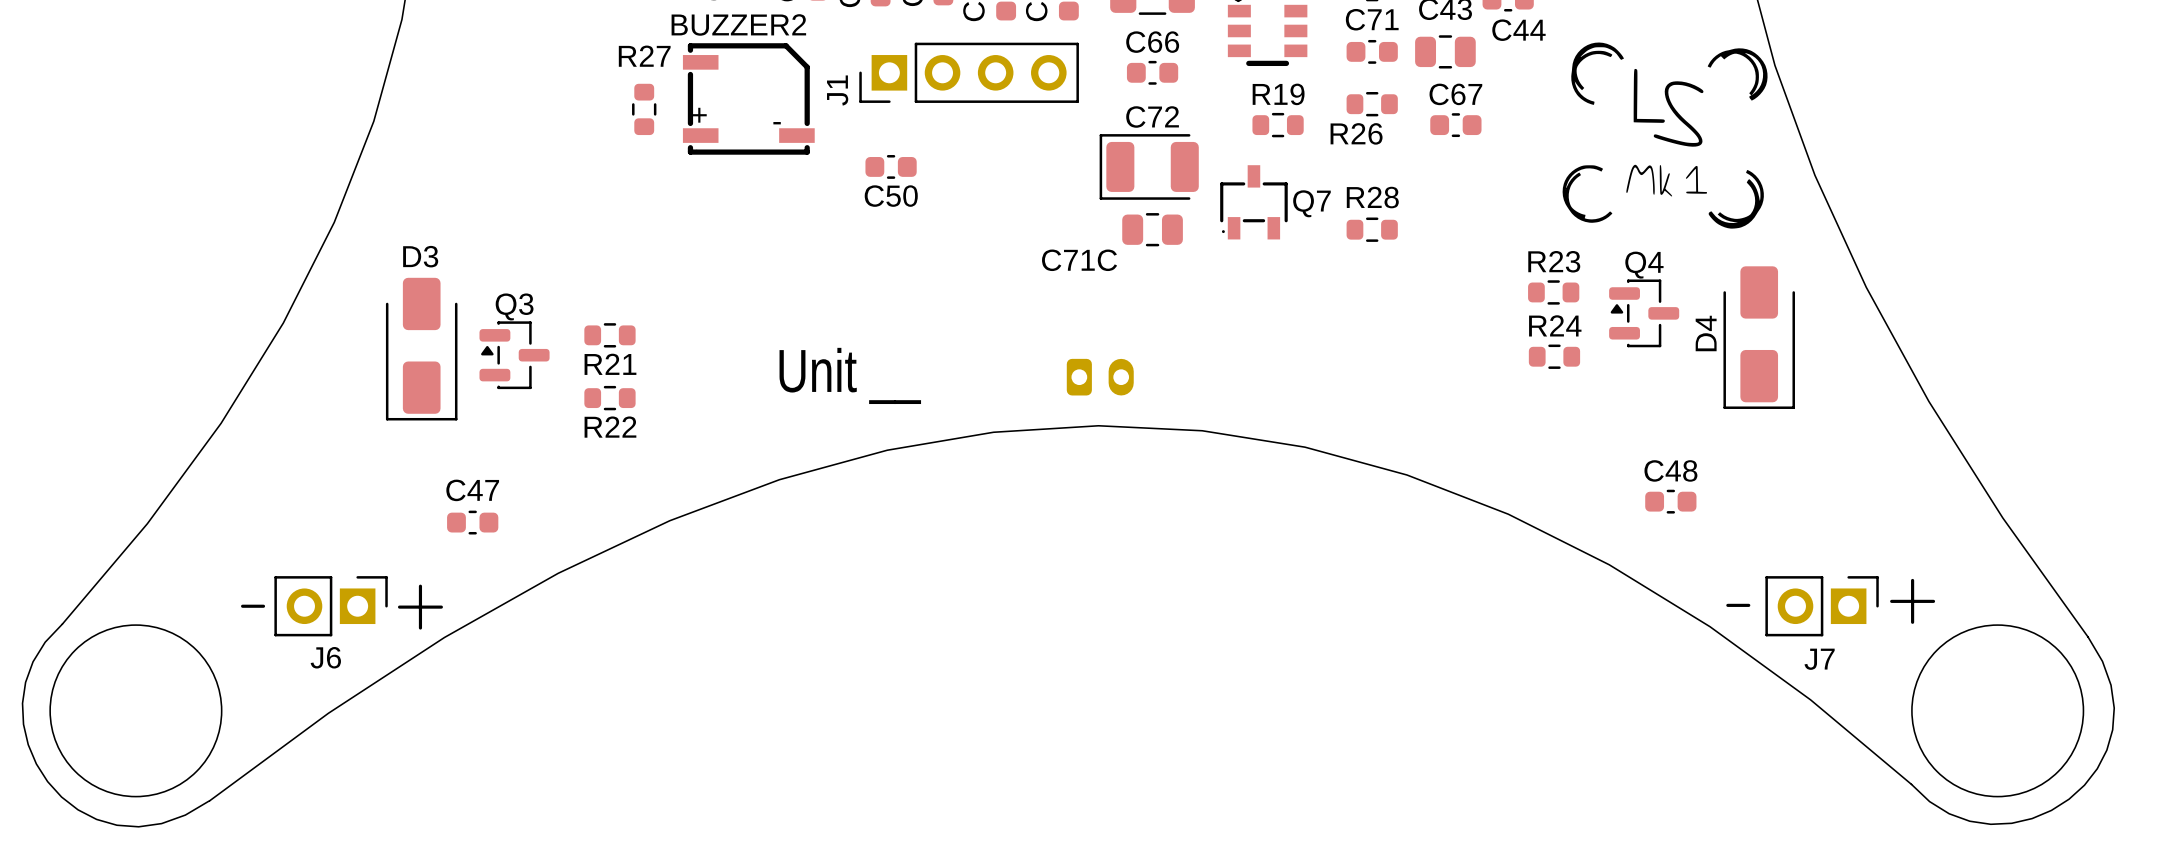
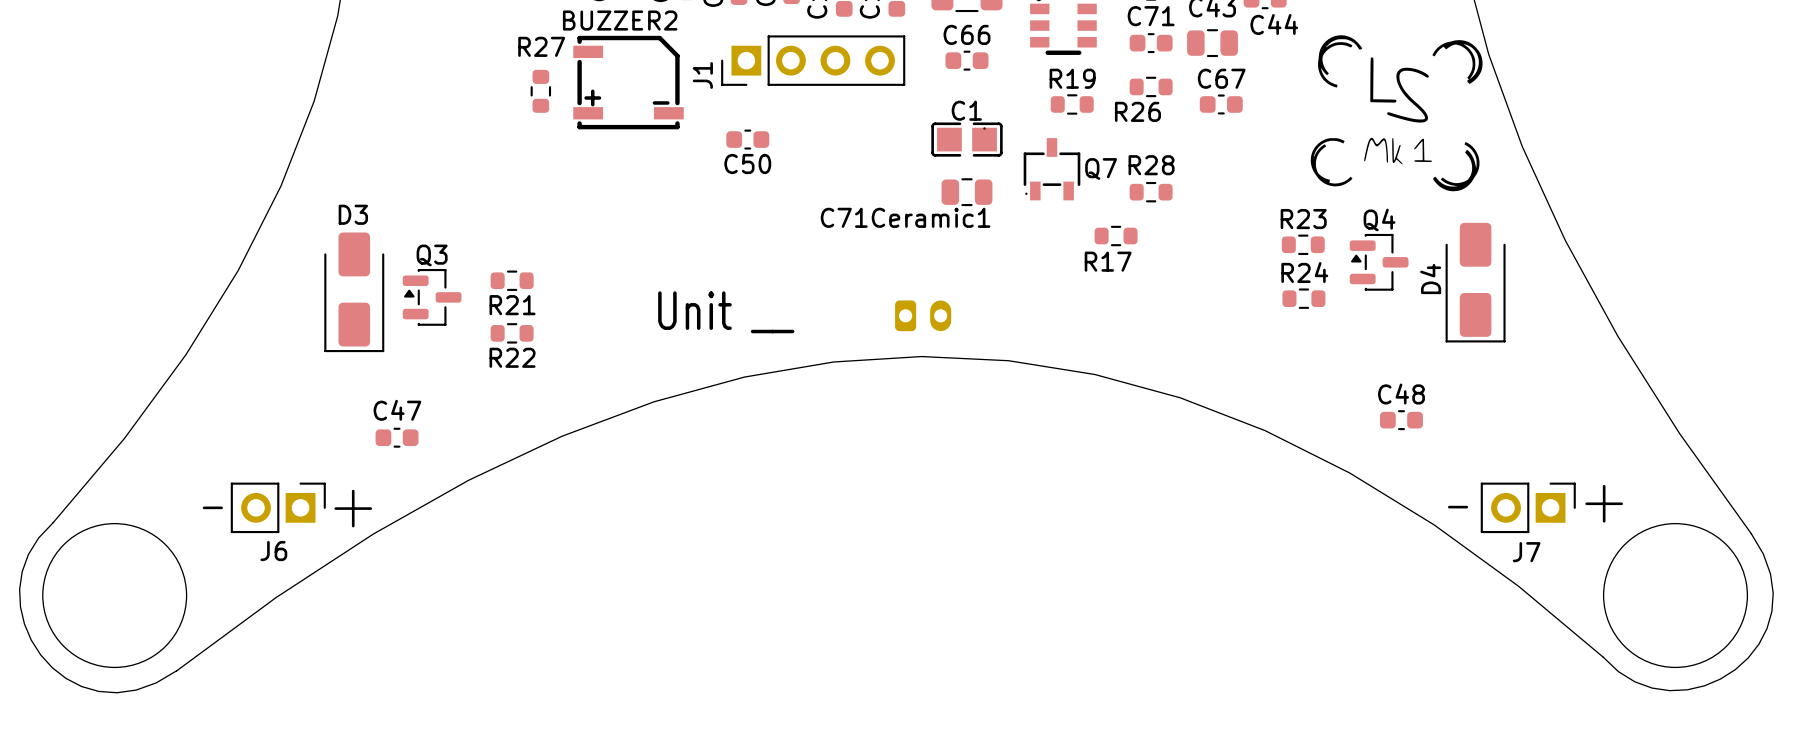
C72: (1149, 166) -> none
C1: none -> (966, 139)
C71C name: C71C (1079, 260) -> C71Ceramic1 (905, 217)
R17: none -> (1116, 236)

